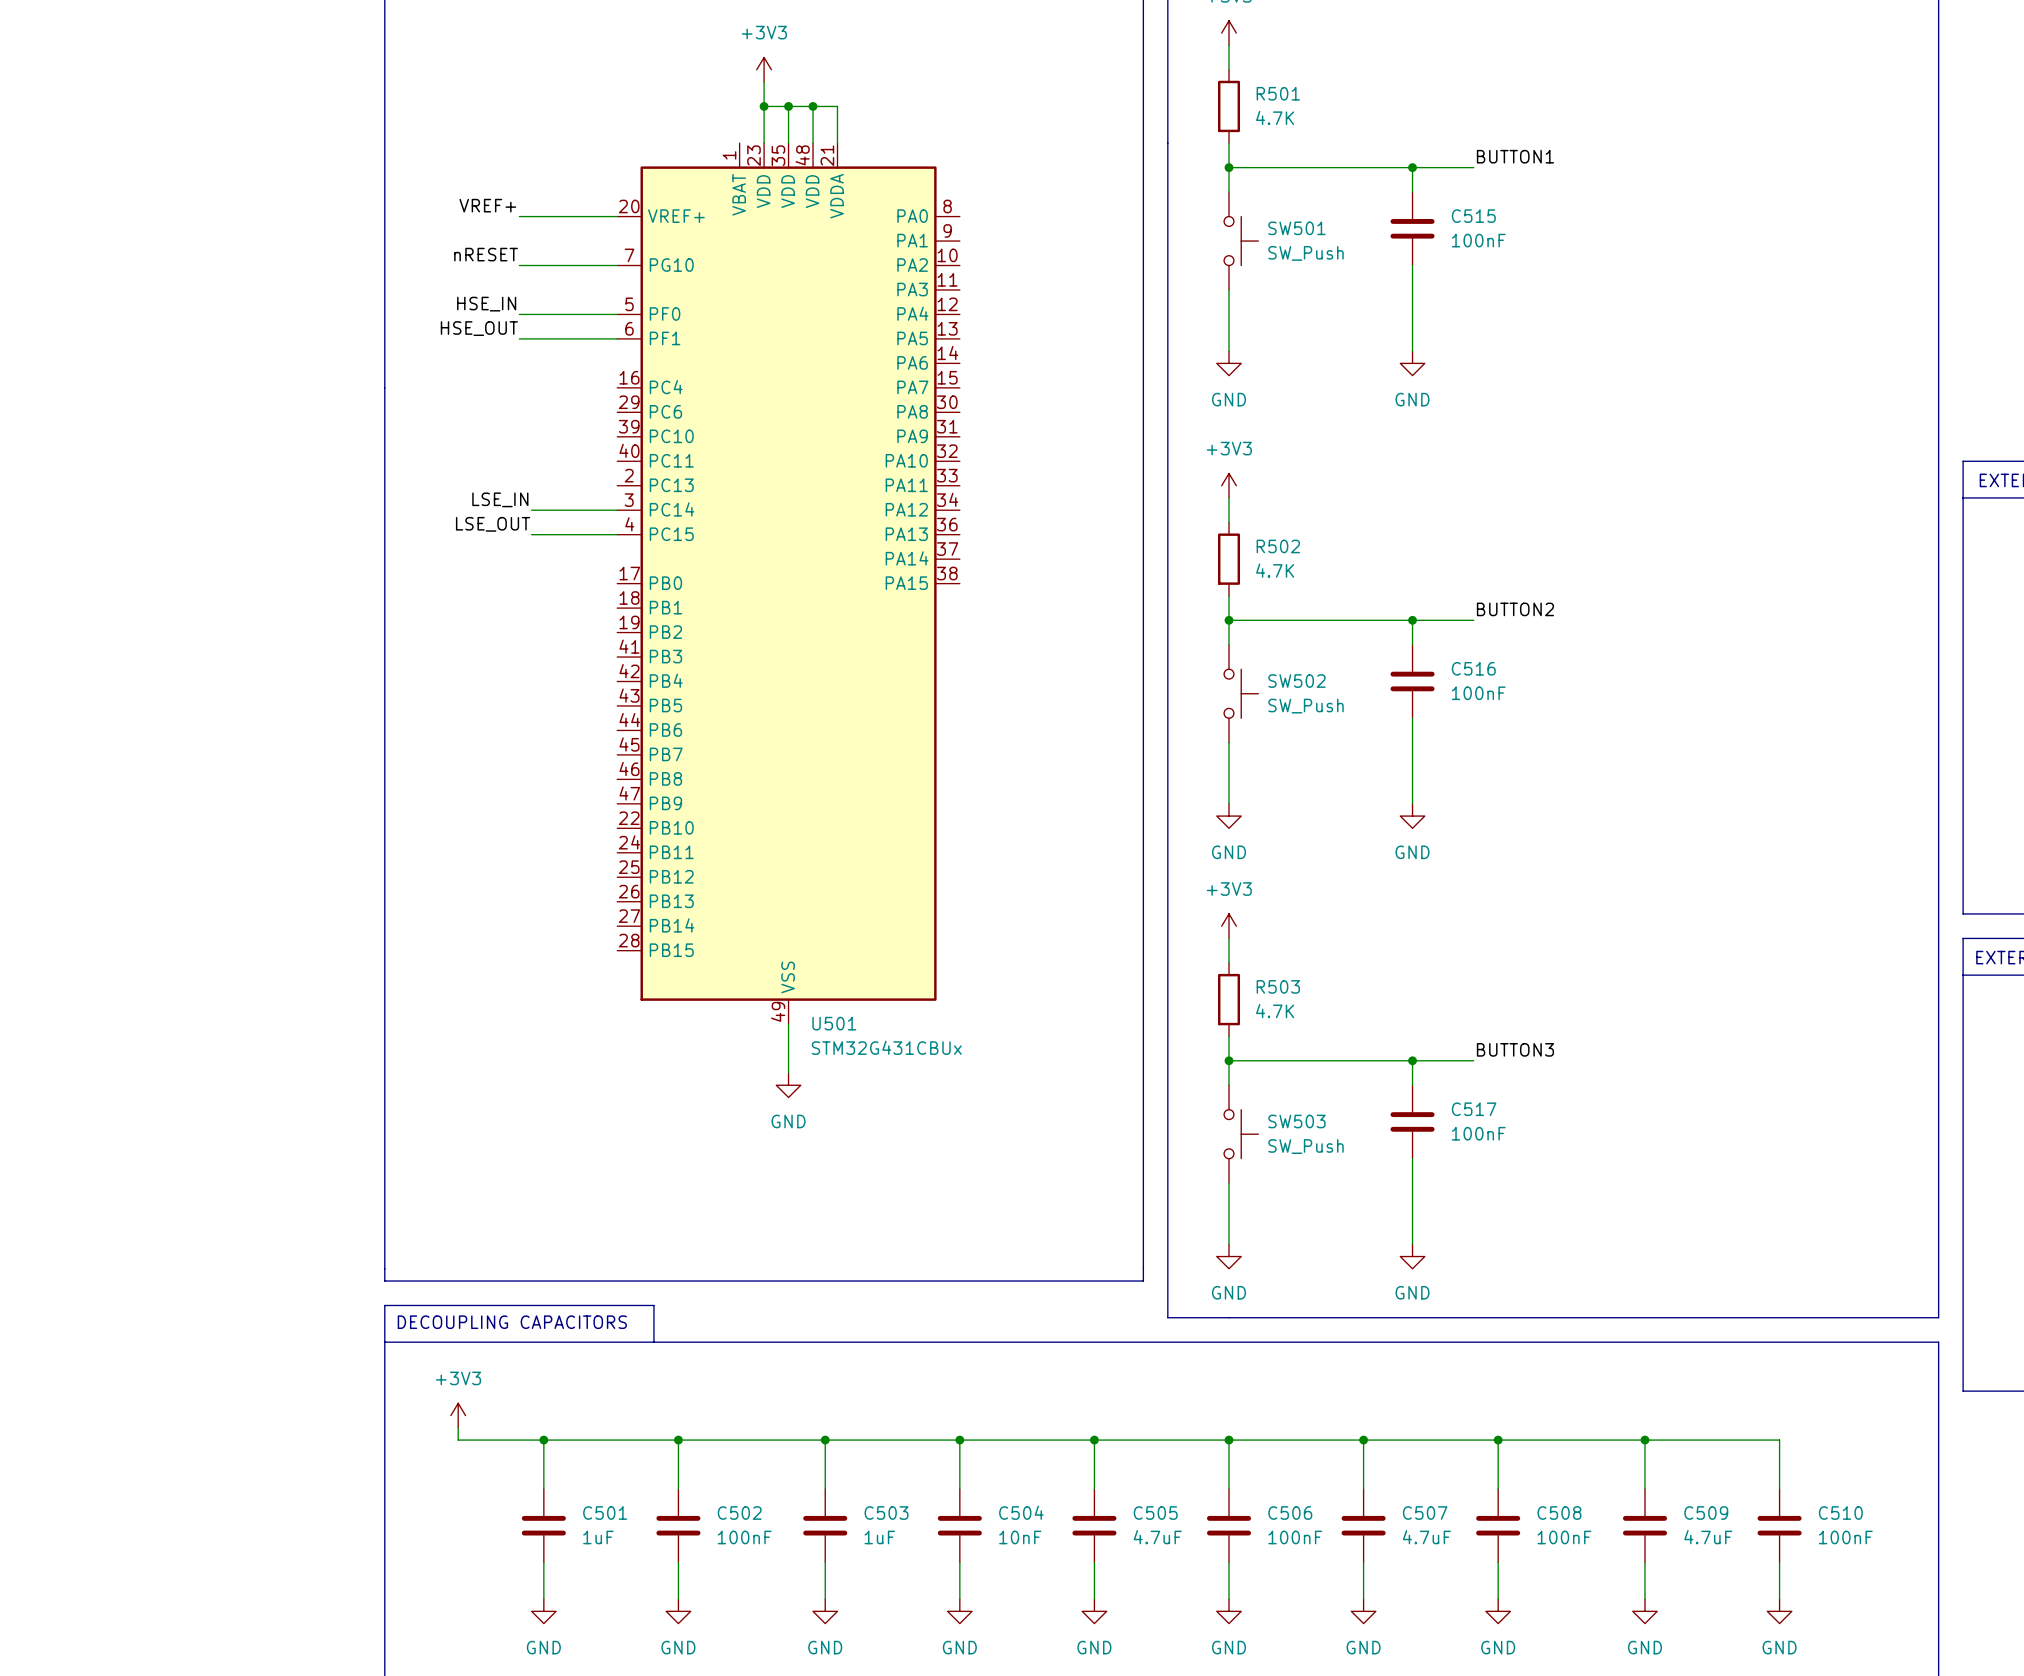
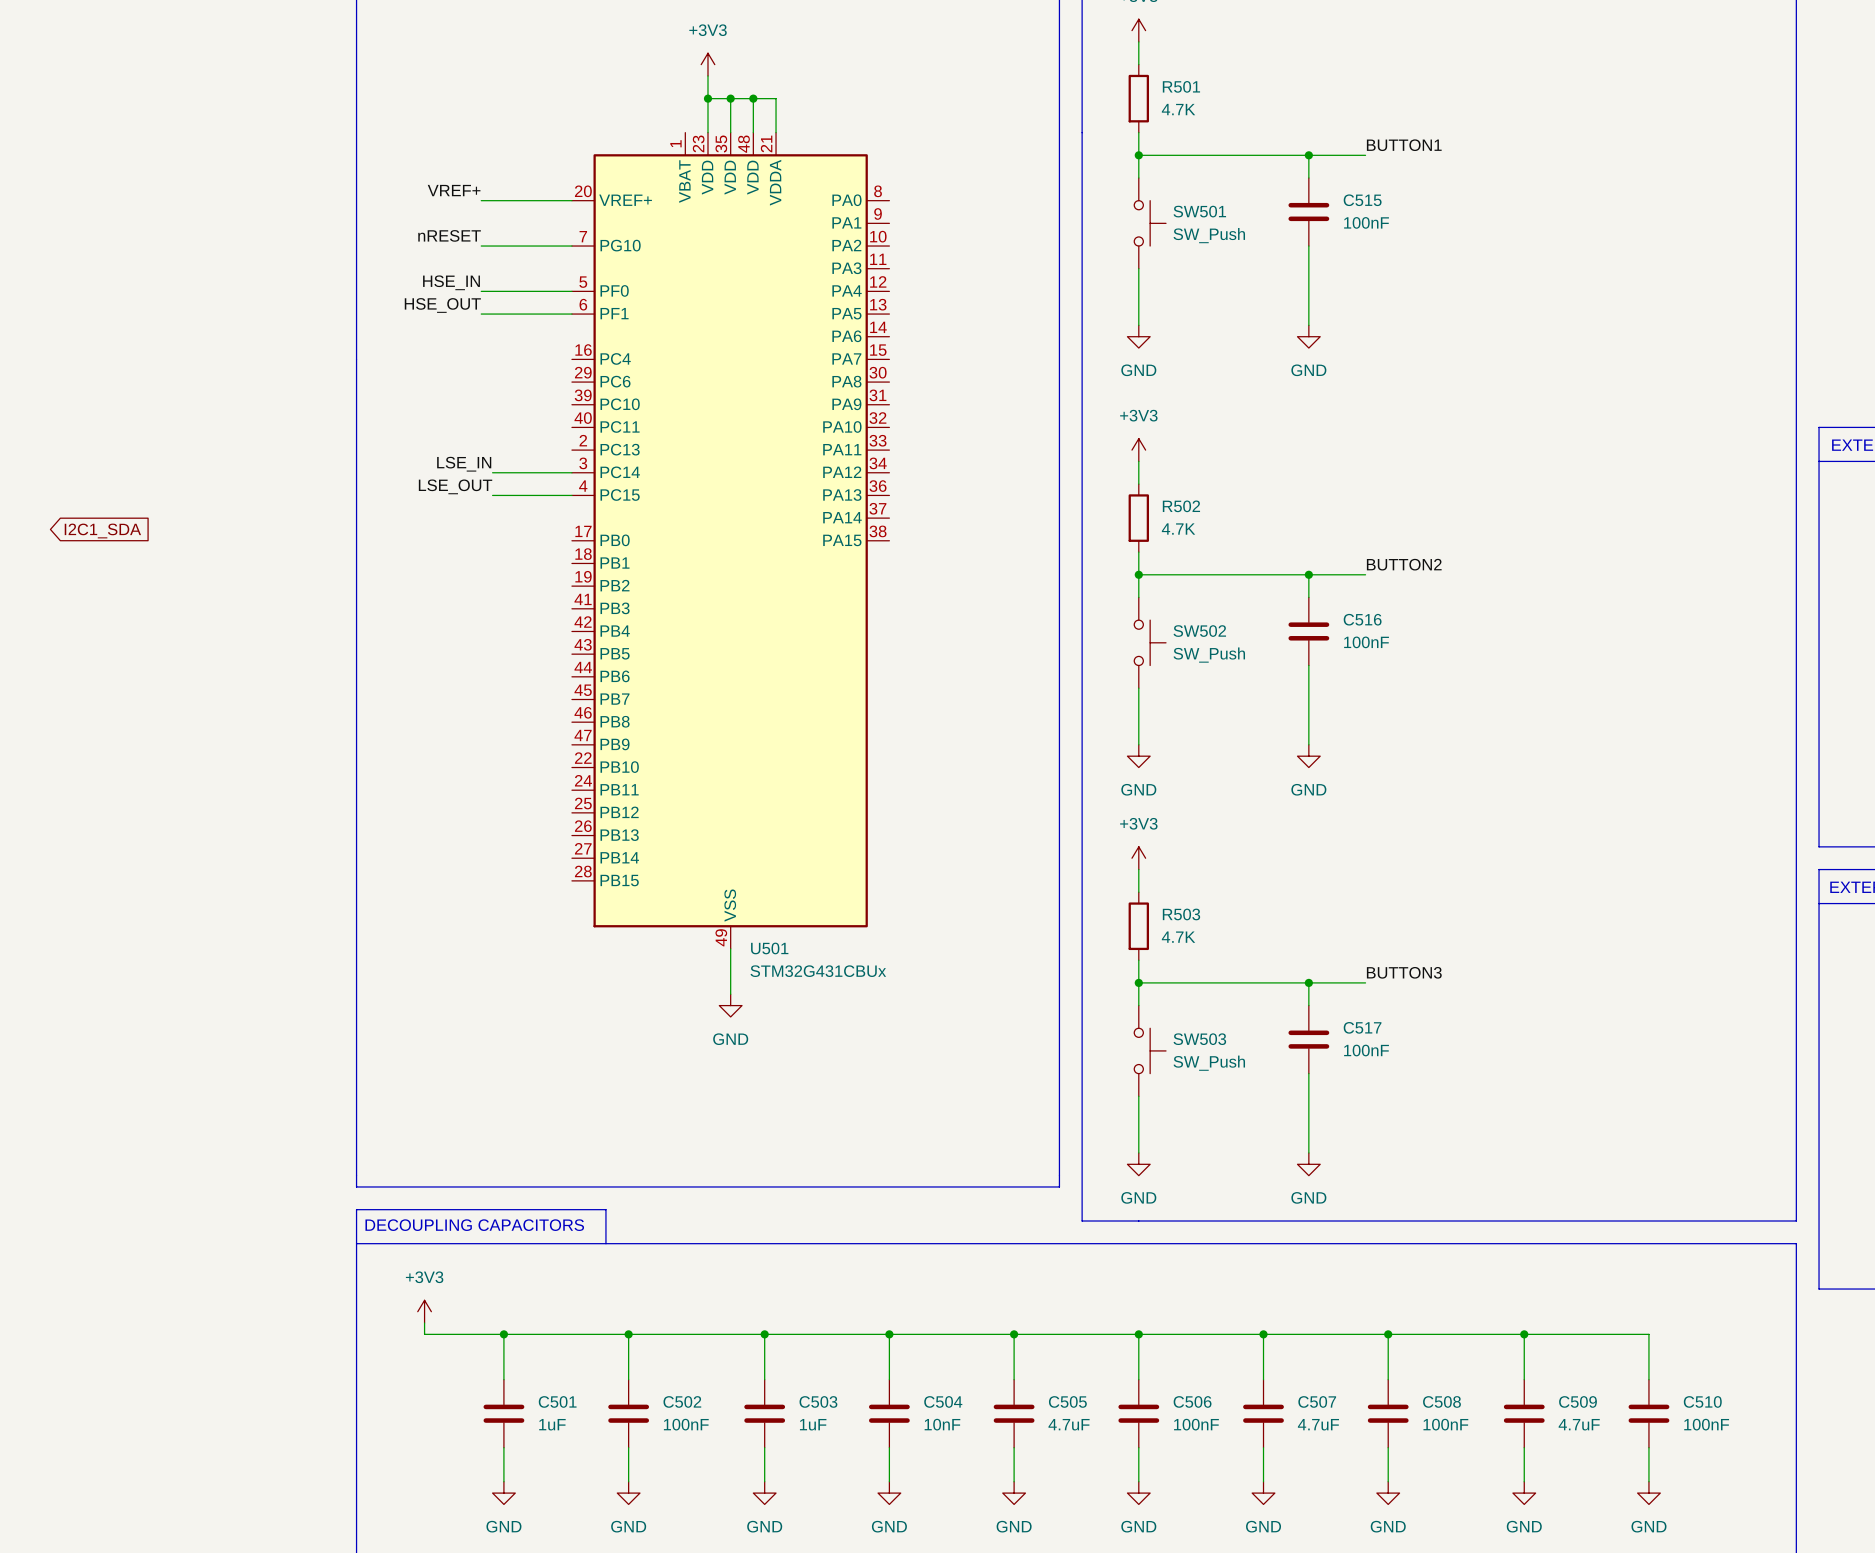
global label: none -> I2C1_SDA (102, 530)

